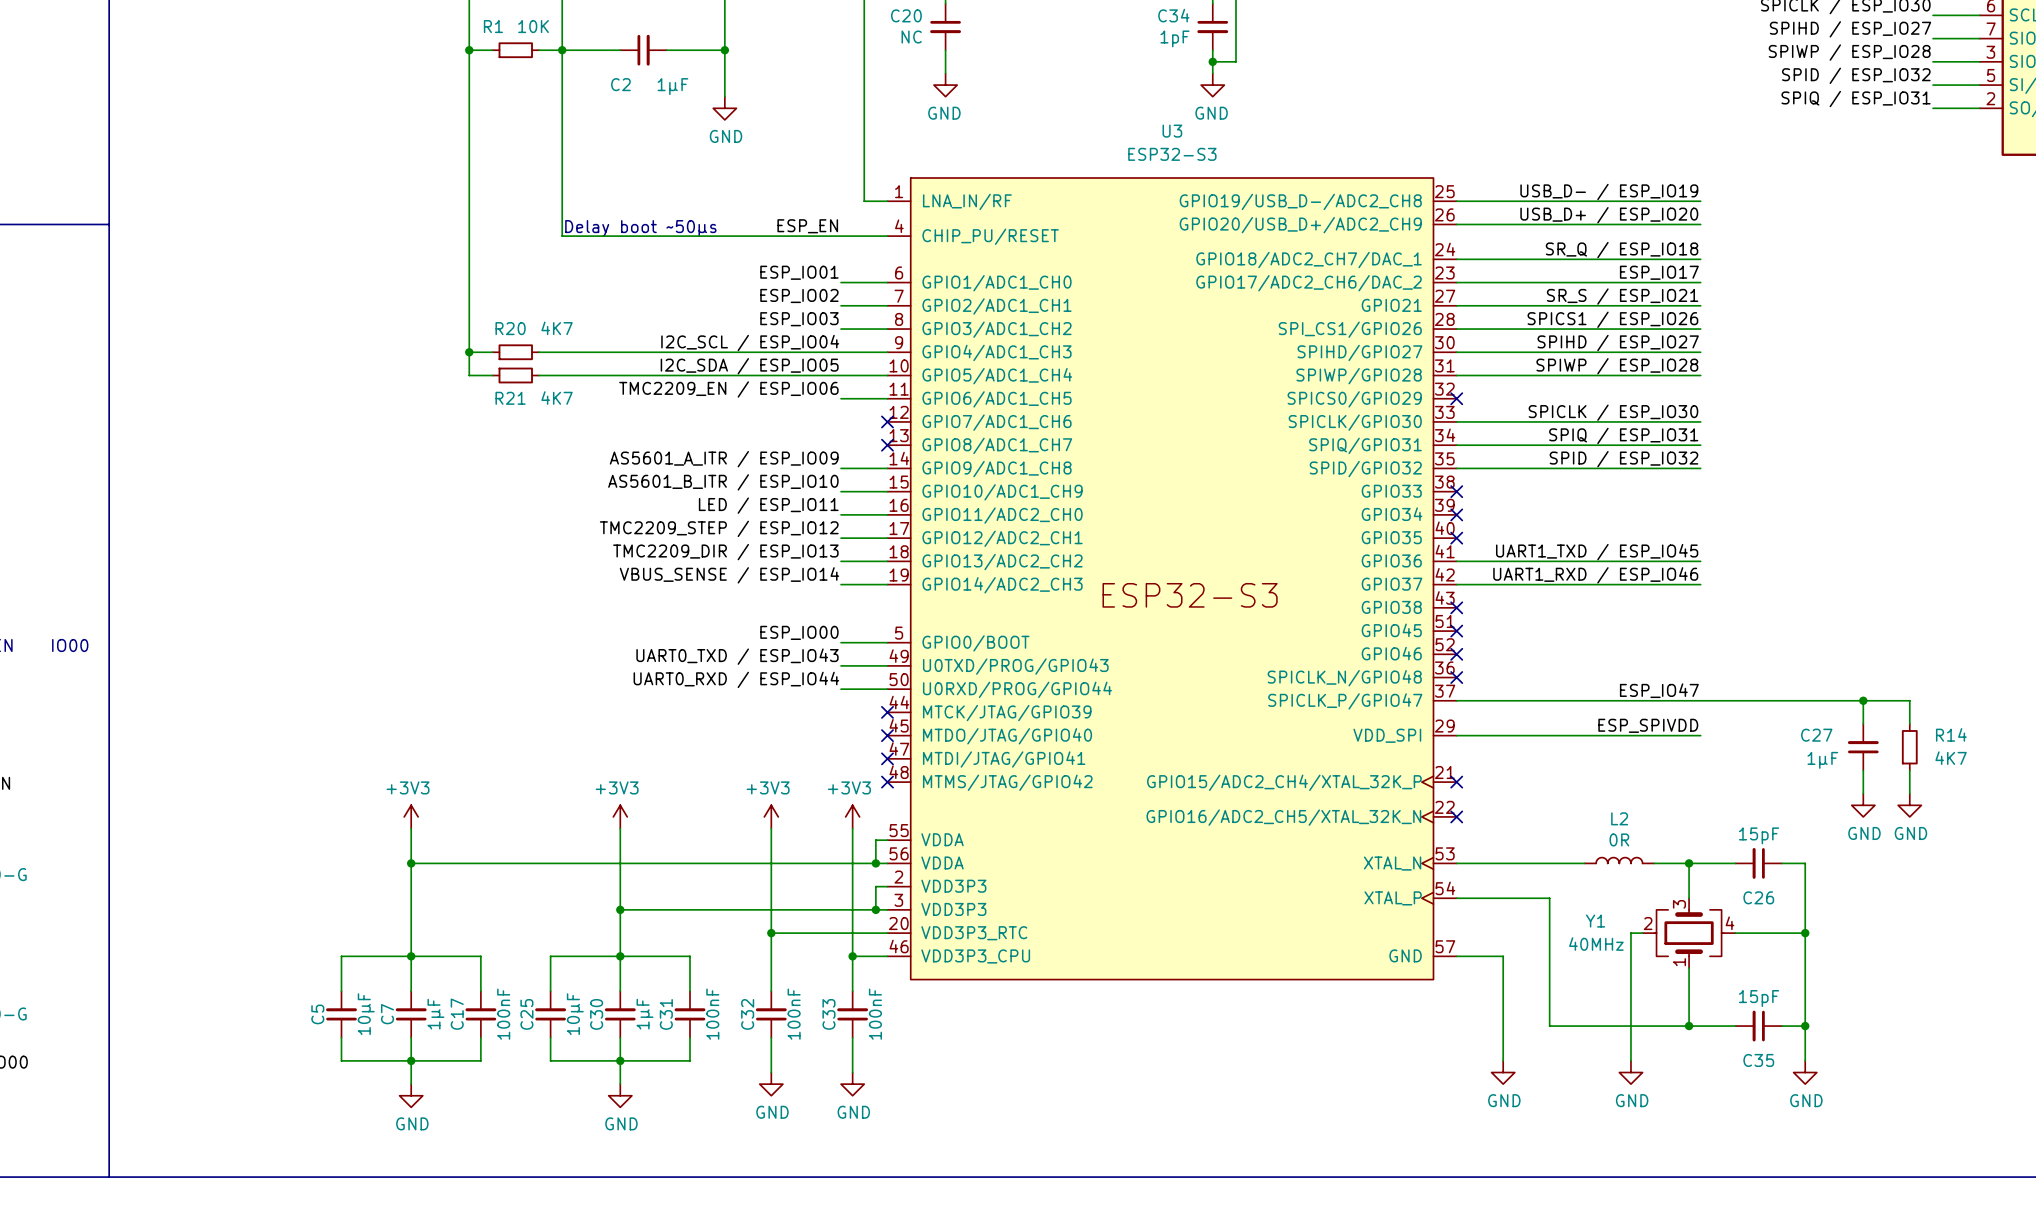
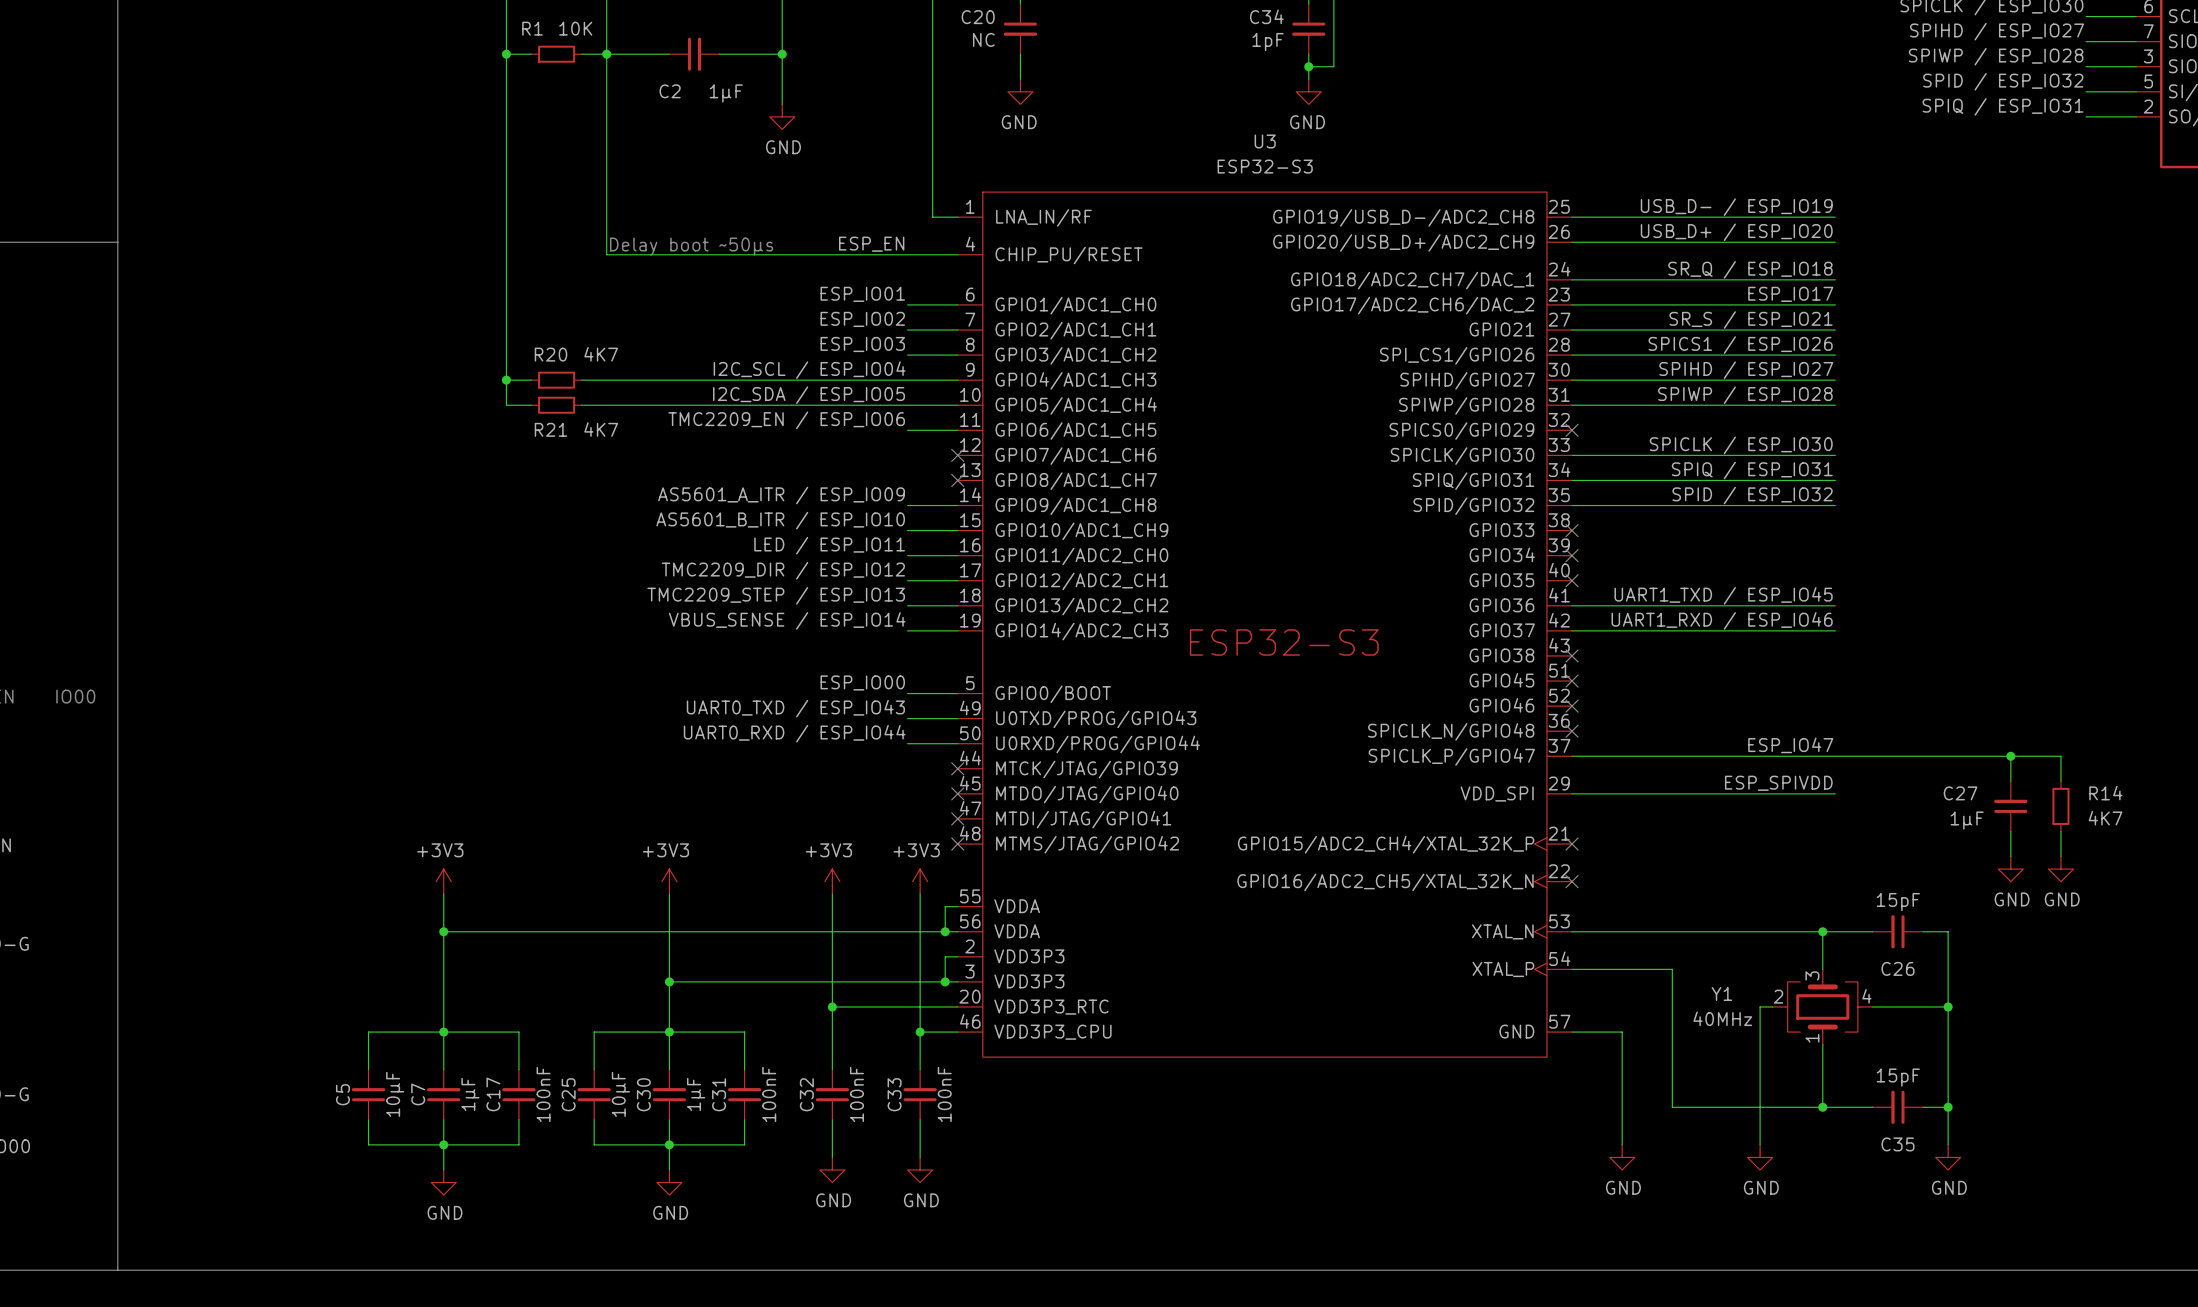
label: TMC2209_STEP / ESP_IO12 (719, 528) -> TMC2209_DIR / ESP_IO12 (783, 570)
label: TMC2209_DIR / ESP_IO13 (725, 552) -> TMC2209_STEP / ESP_IO13 (776, 595)
L2: 0R (1619, 860) -> none
wire: none -> (1709, 931) (1785, 931)

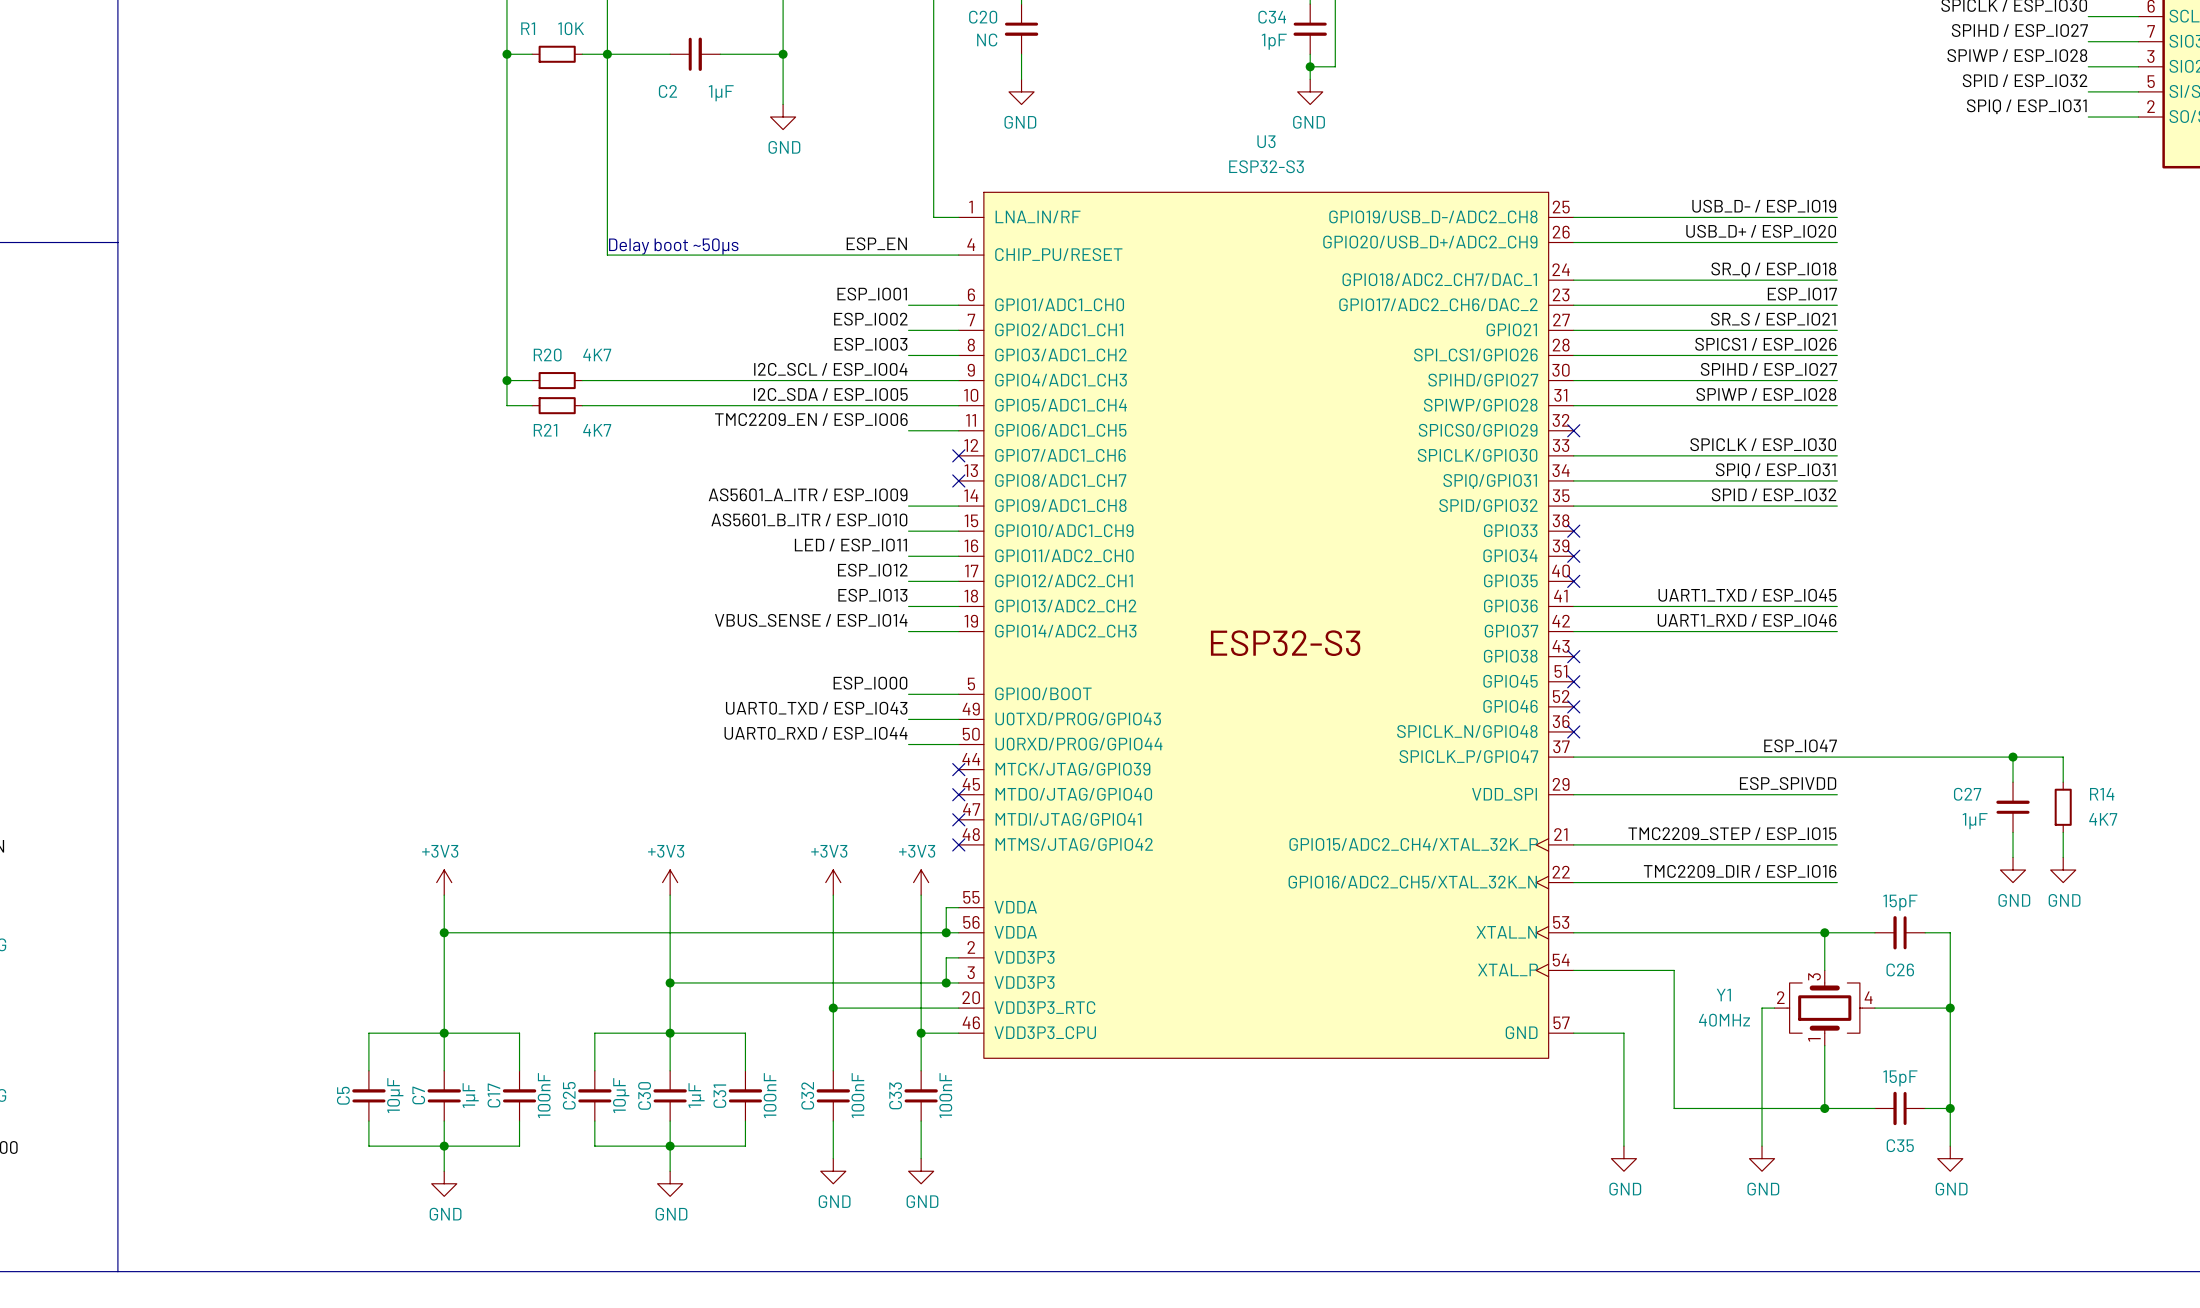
label: TMC2209_DIR / ESP_IO12 (783, 570) -> ESP_IO12 (872, 570)
label: TMC2209_STEP / ESP_IO13 (776, 595) -> ESP_IO13 (872, 595)
label: none -> TMC2209_STEP / ESP_IO15 (1732, 833)
wire: none -> (1573, 844) (1837, 844)
no-connect mark: (1572, 844) -> none
label: none -> TMC2209_DIR / ESP_IO16 (1740, 871)
wire: none -> (1573, 882) (1837, 882)
no-connect mark: (1572, 881) -> none

